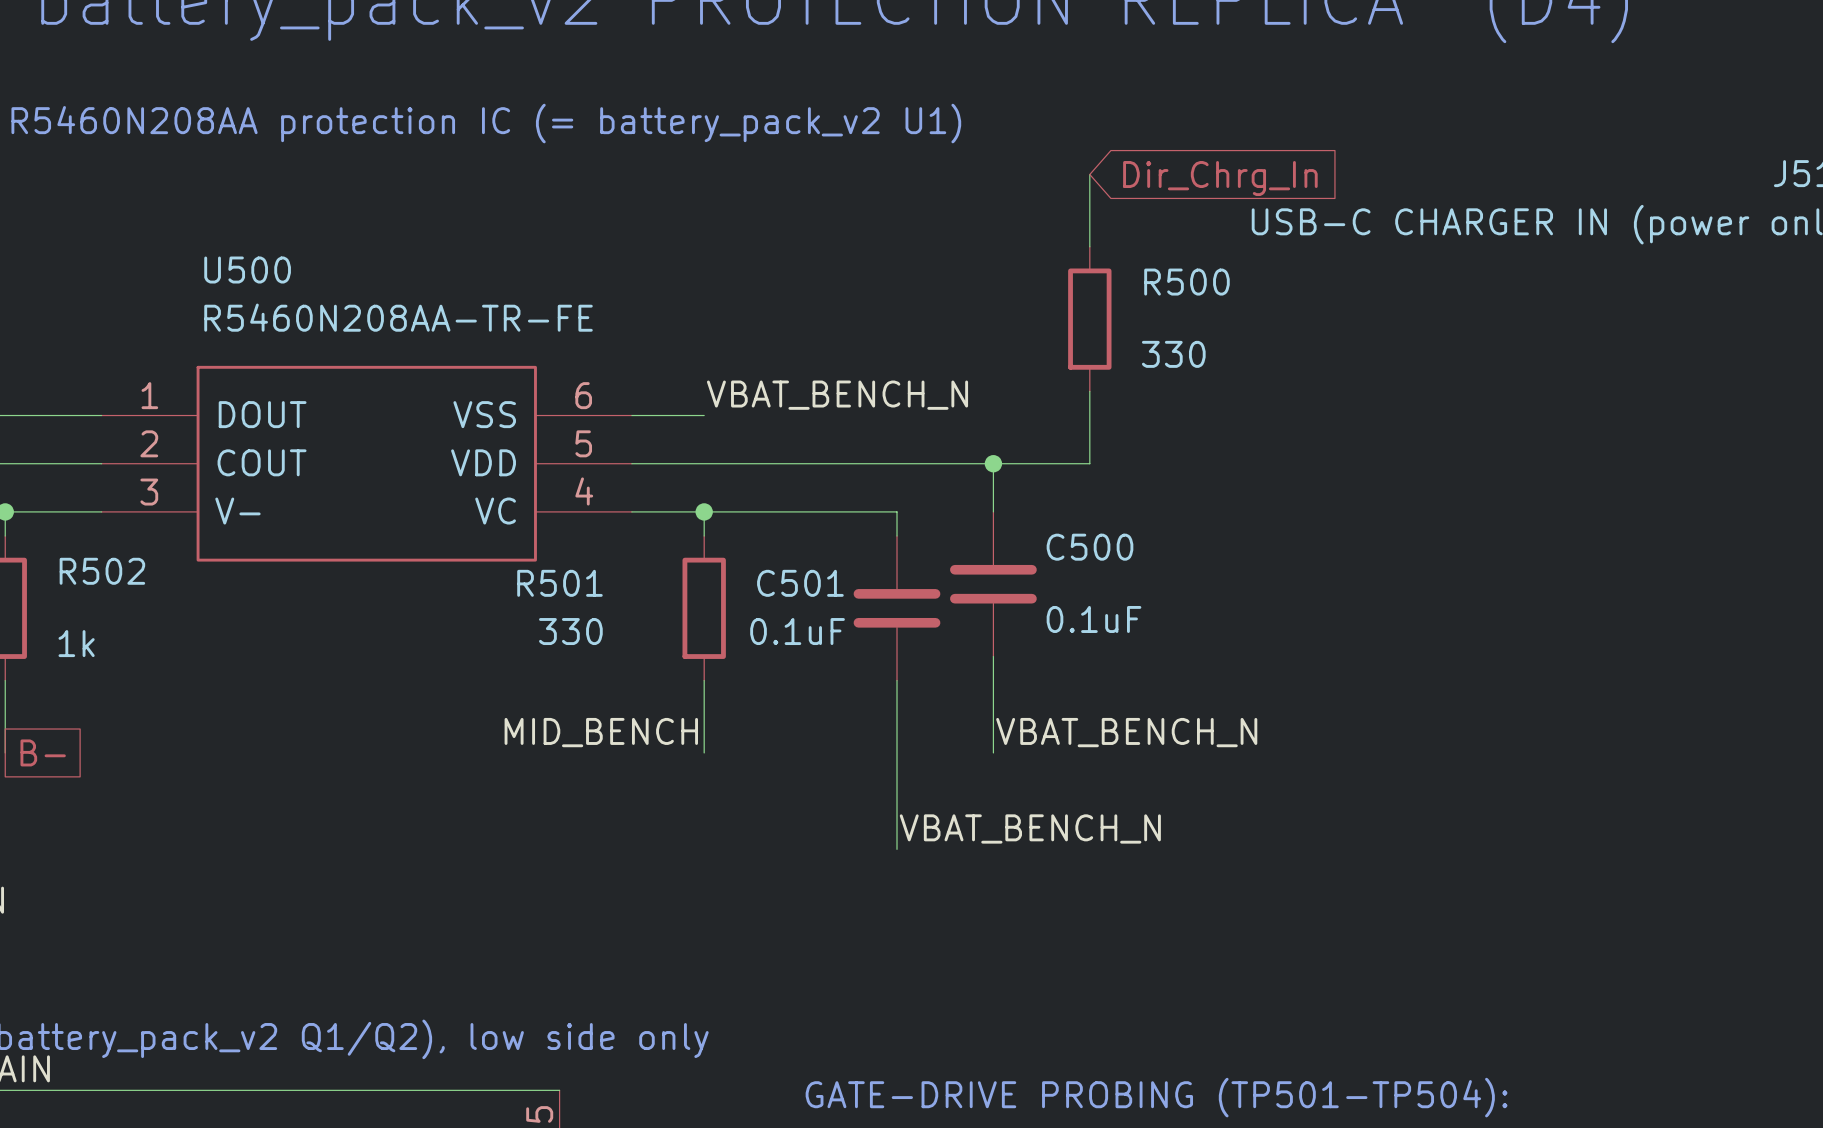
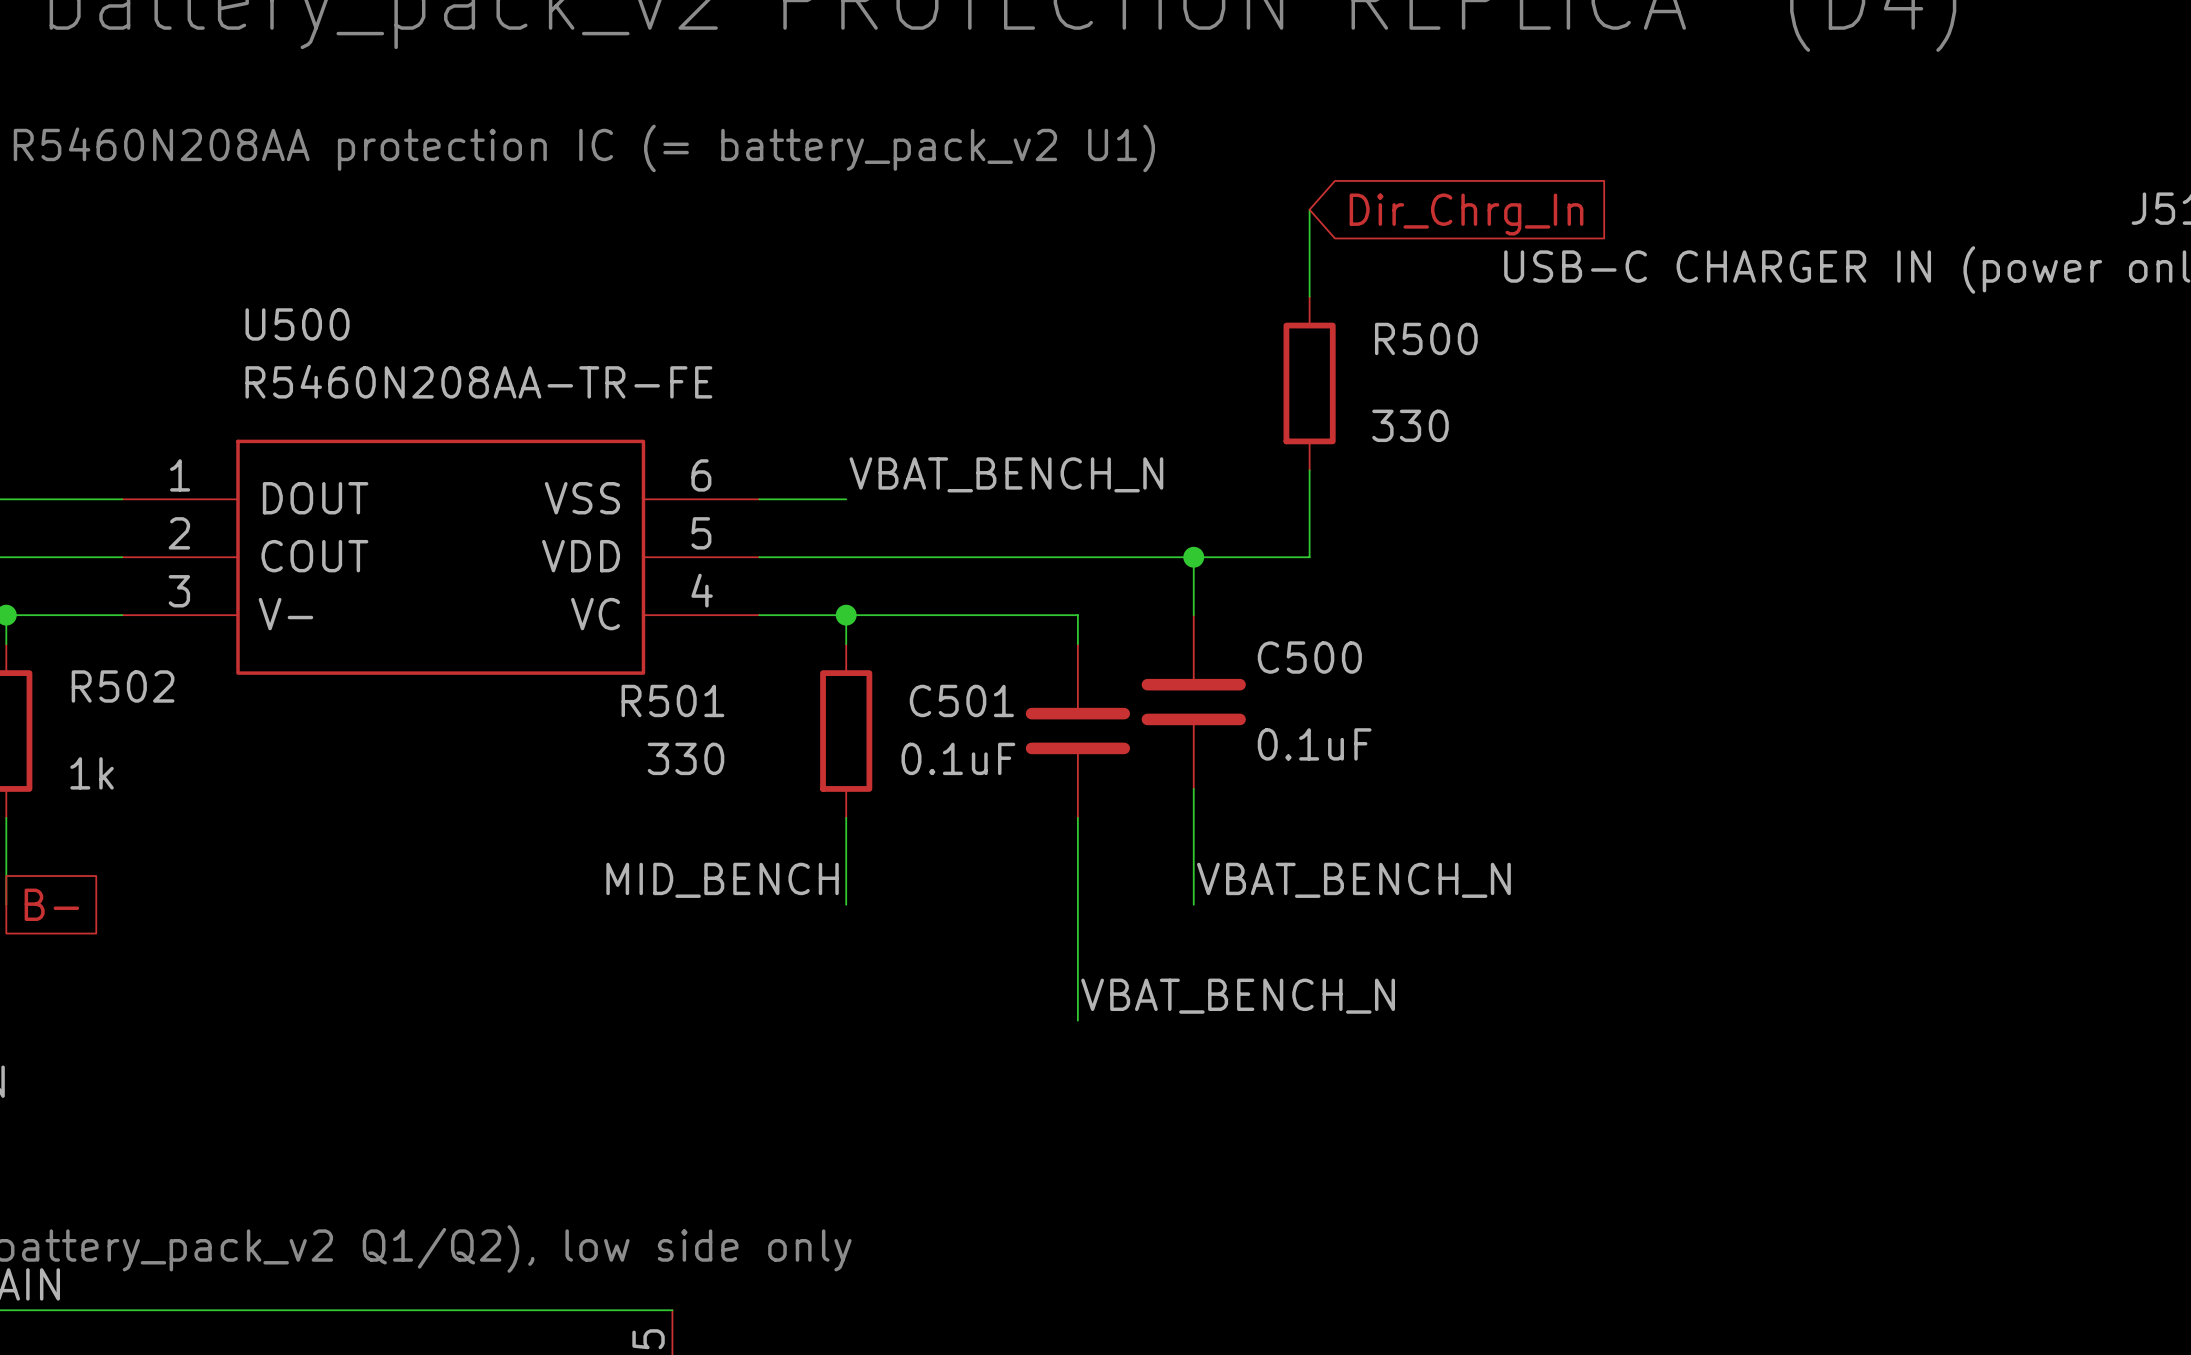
text: GATE-DRIVE PROBING (TP501-TP504): (1156, 1097) -> none

